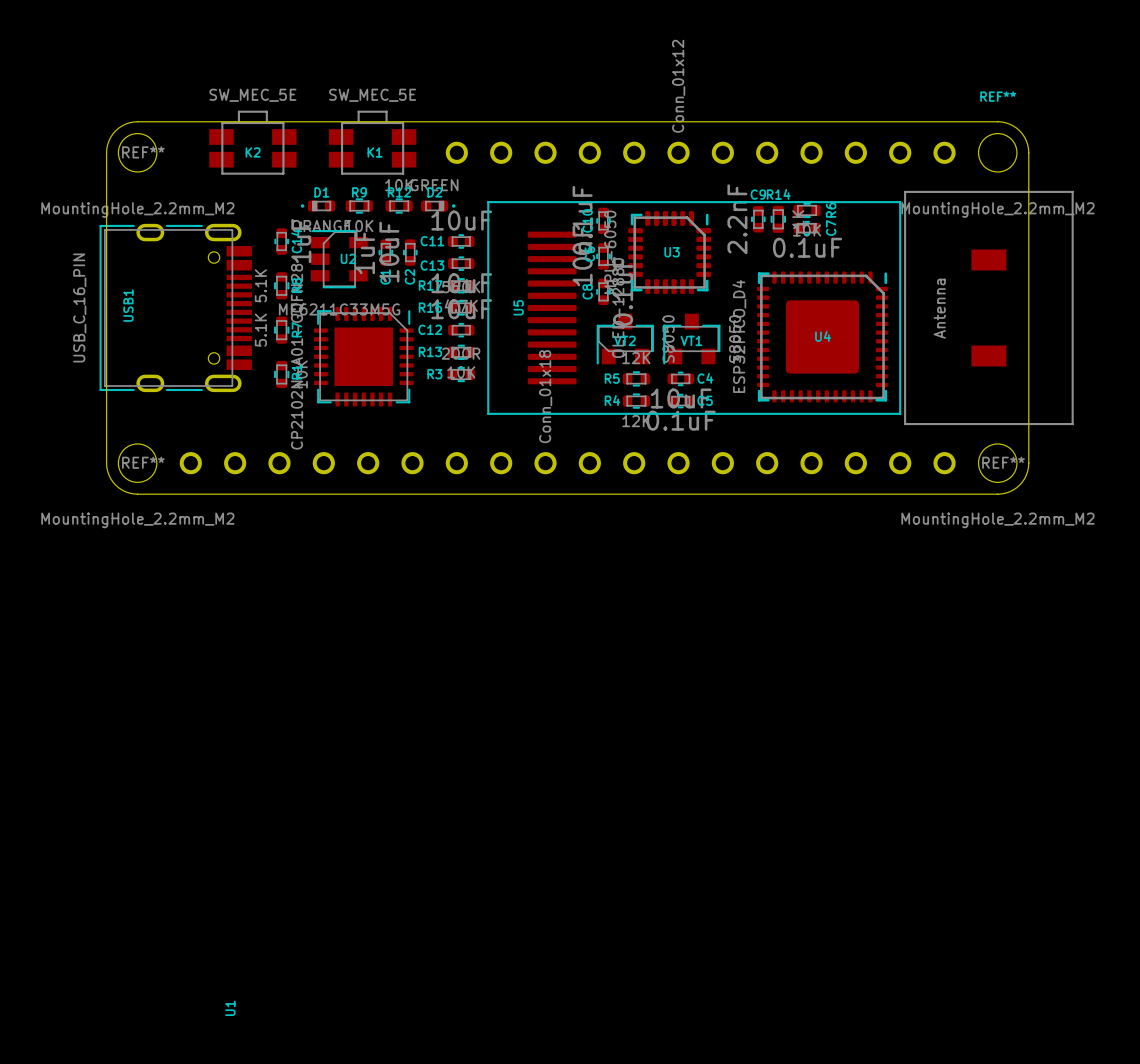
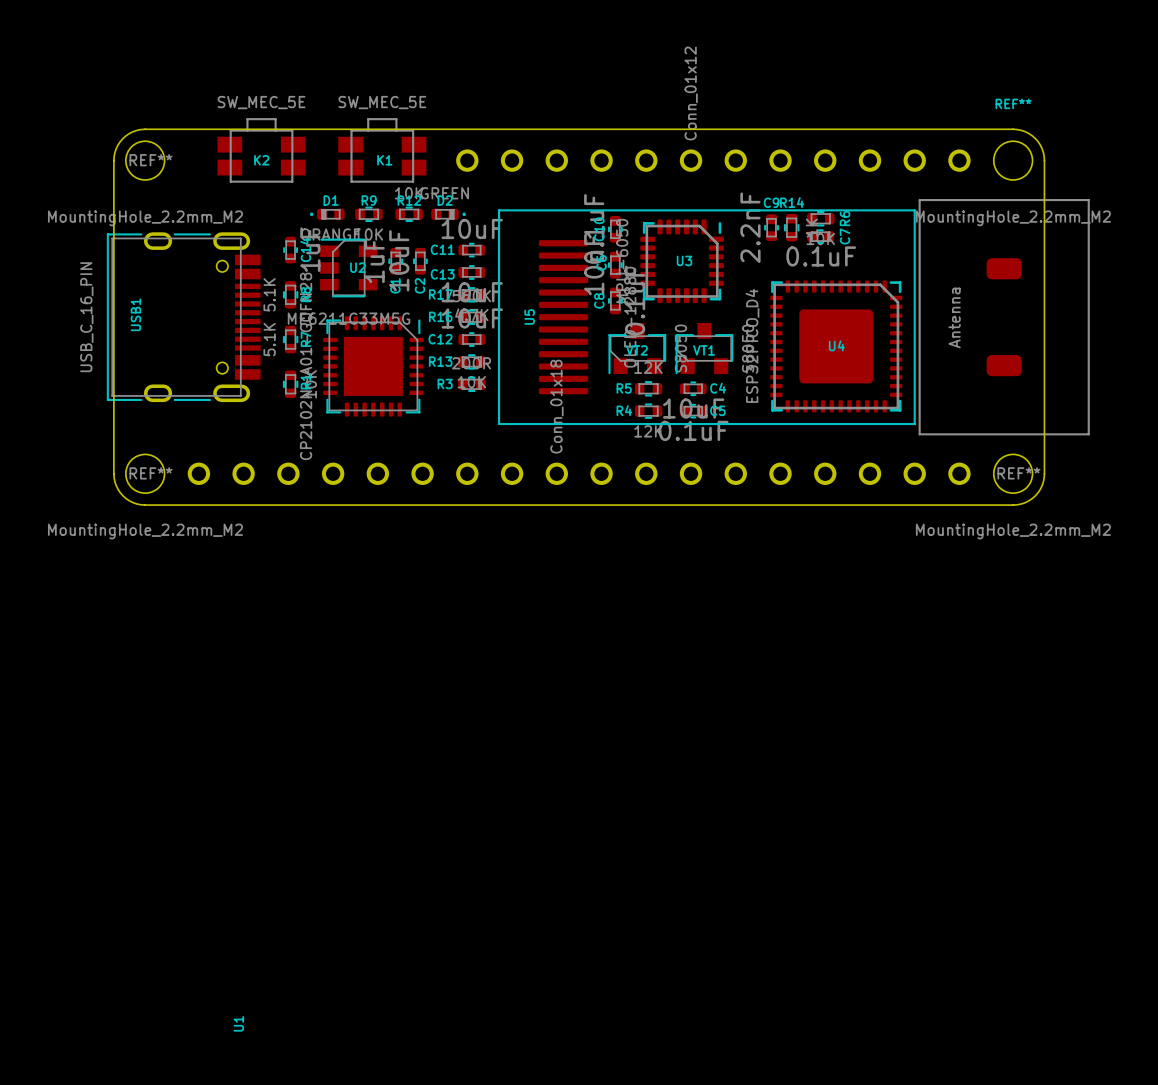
part footprint: [904, 190, 1074, 426] -> [918, 199, 1090, 436]
U4 footprint: [757, 271, 888, 403] -> [770, 280, 903, 413]

